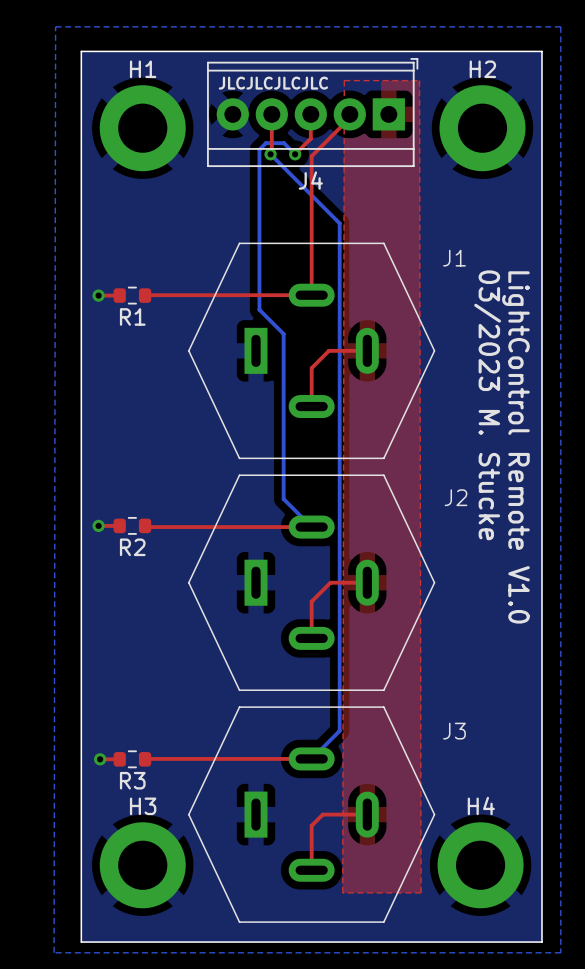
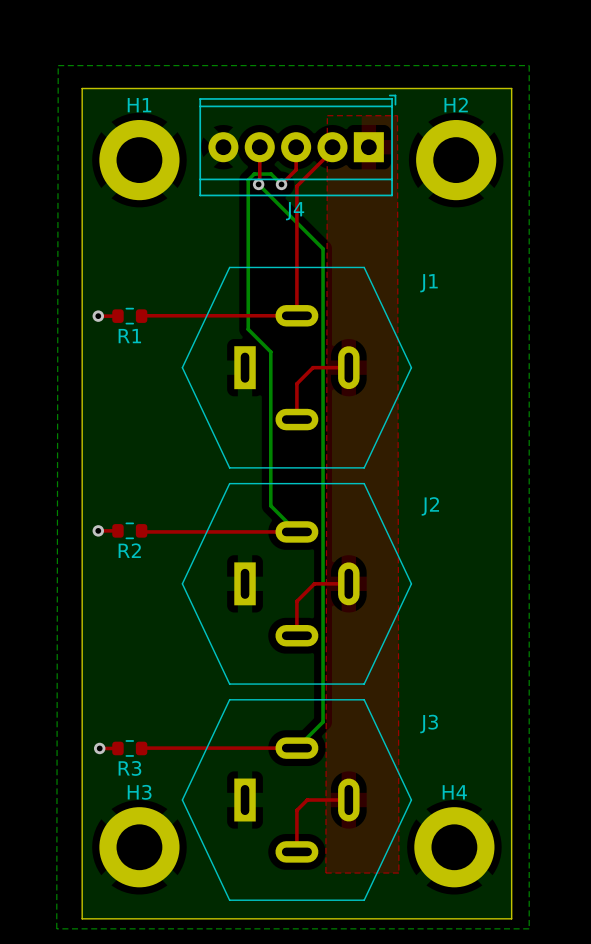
text: JLCJLCJLCJLC (273, 83) -> none
text: 03/2023 M. Stucke (487, 405) -> none
text: LightControl Remote V1.0 (515, 447) -> none

